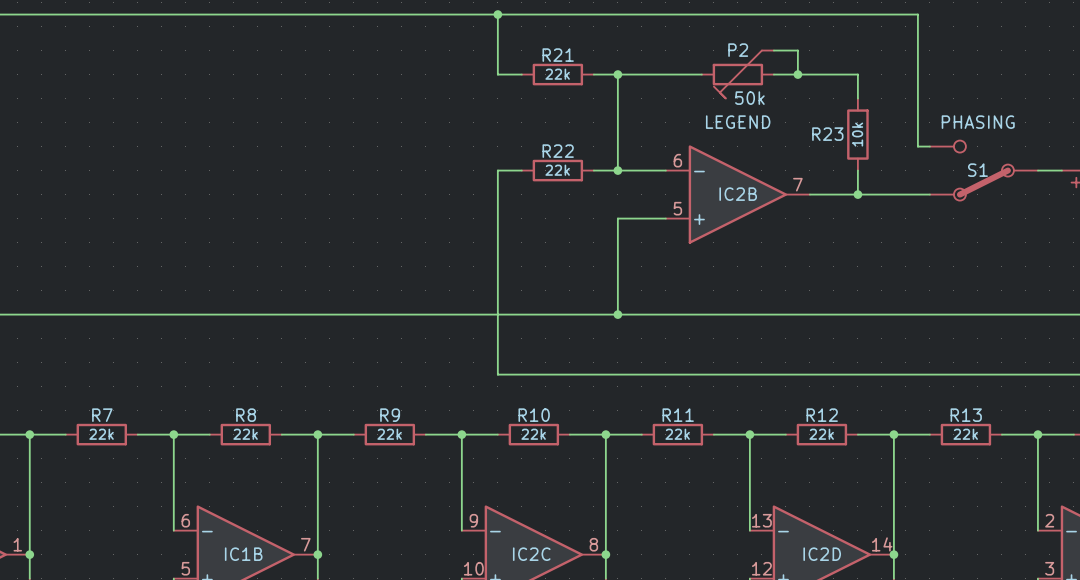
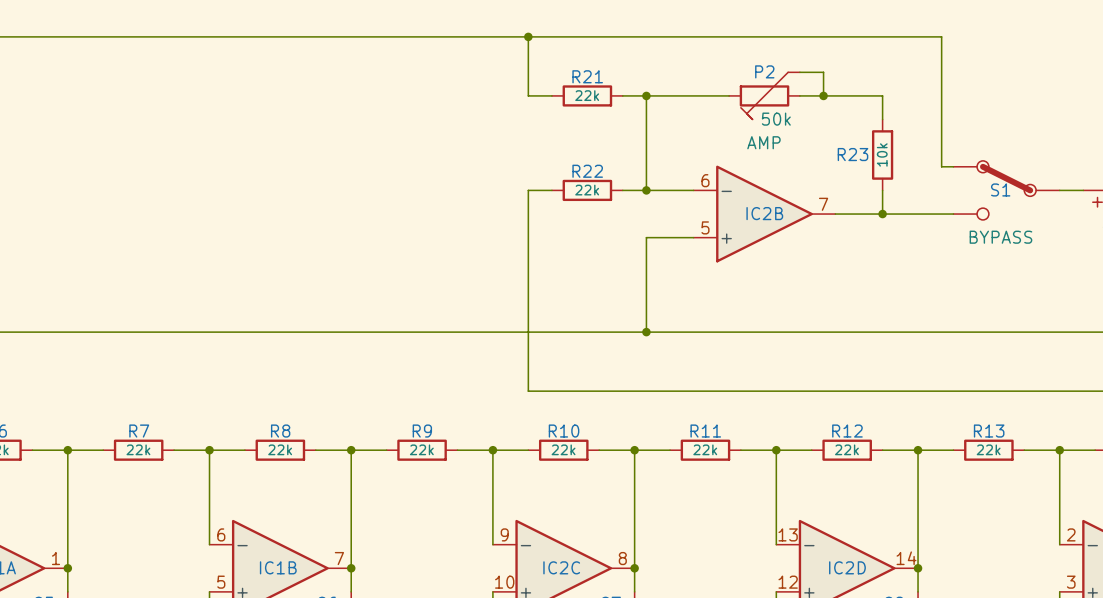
P2 text: LEGEND (738, 122) -> AMP (763, 142)
S1 value: PHASING (978, 122) -> BYPASS (1000, 237)
S1 flip: as is (983, 170) -> up-down (1006, 190)

